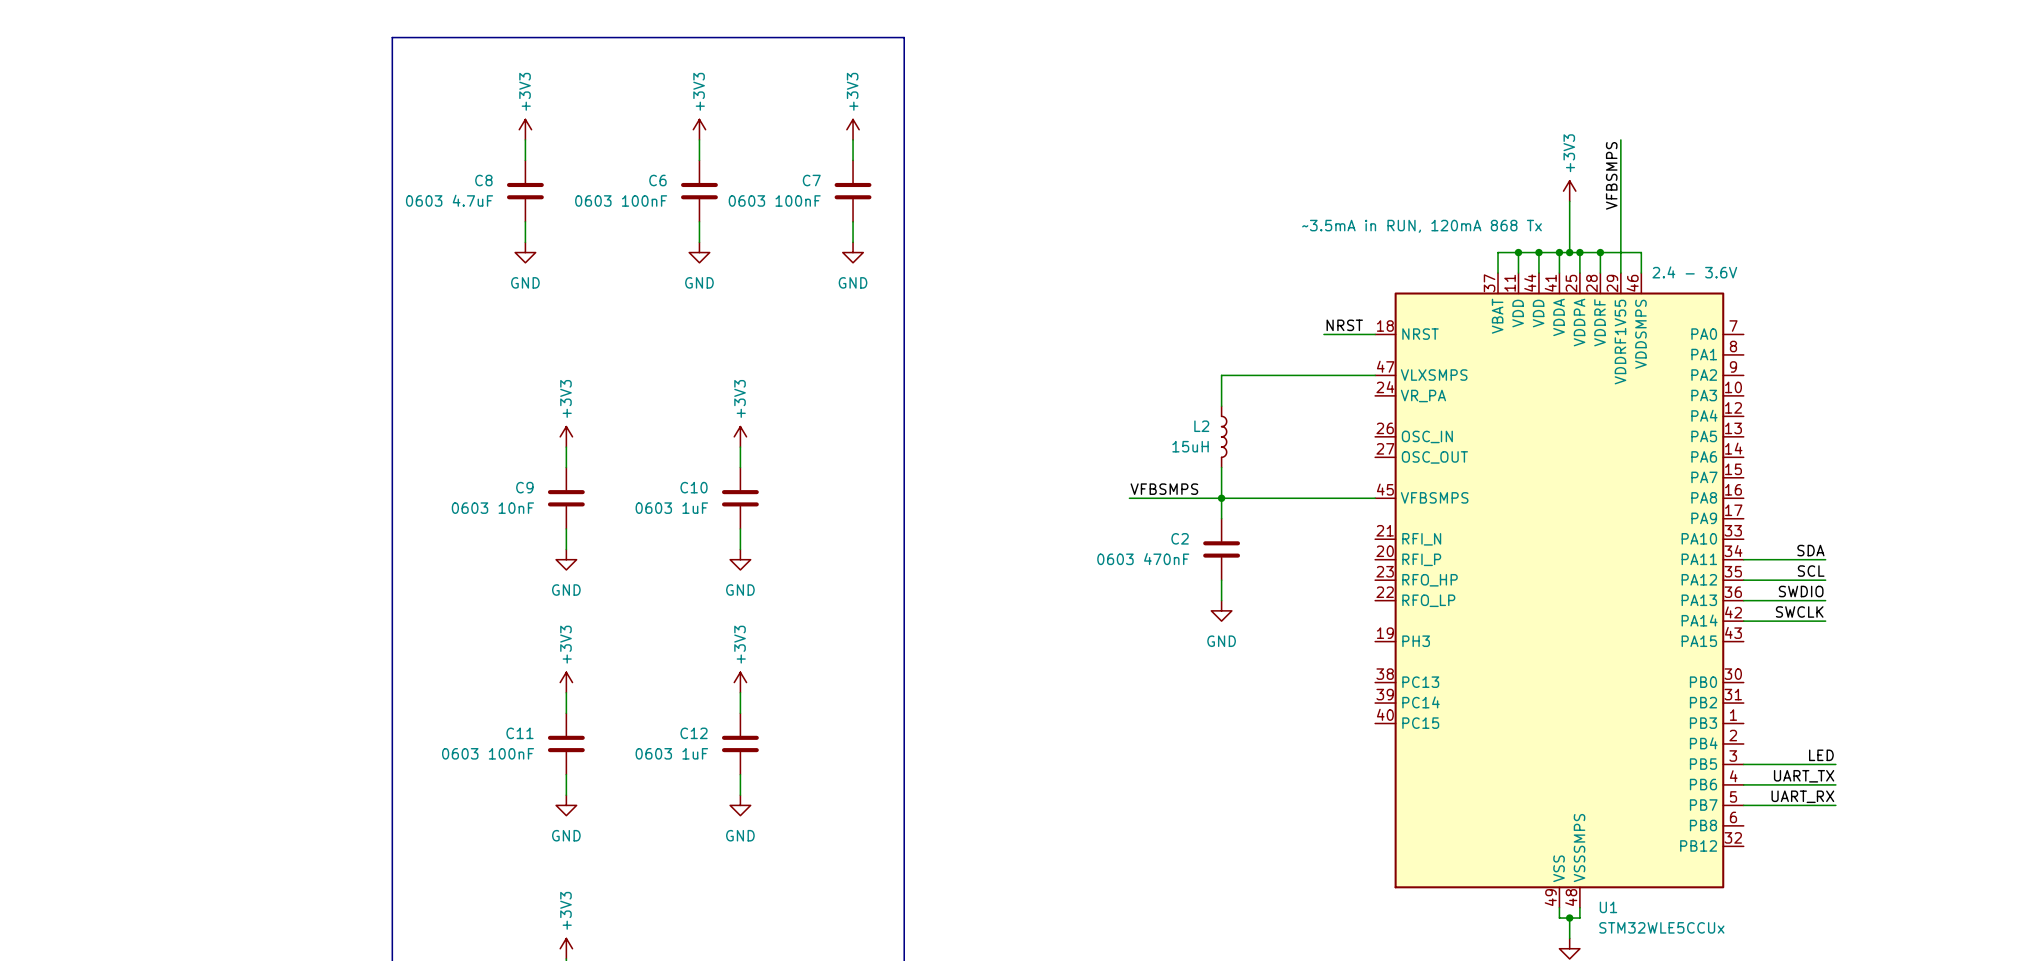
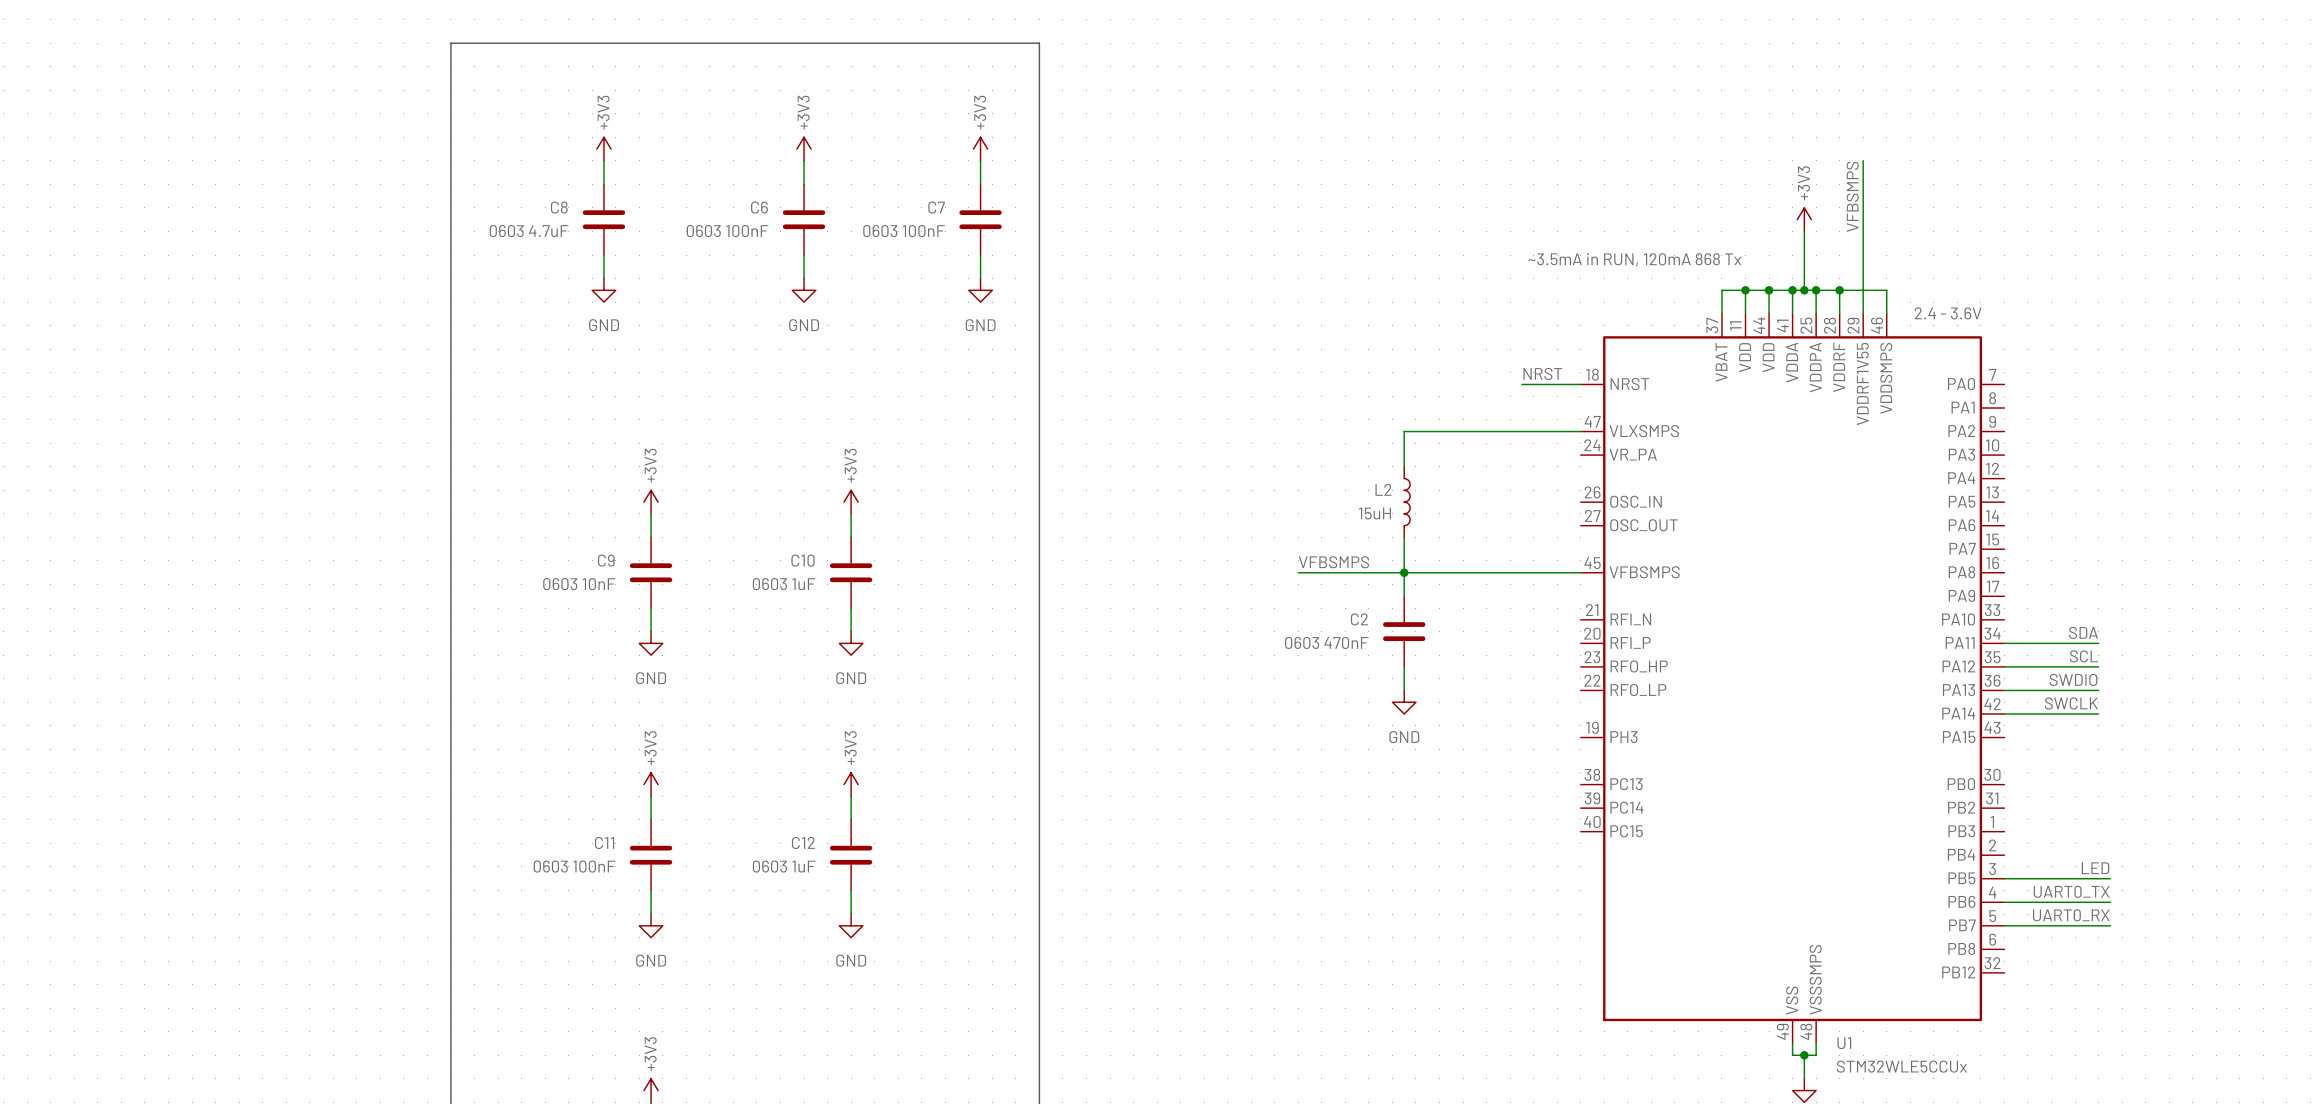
label: UART_TX (1804, 776) -> UART0_TX (2071, 891)
label: UART_RX (1802, 796) -> UART0_RX (2071, 915)

